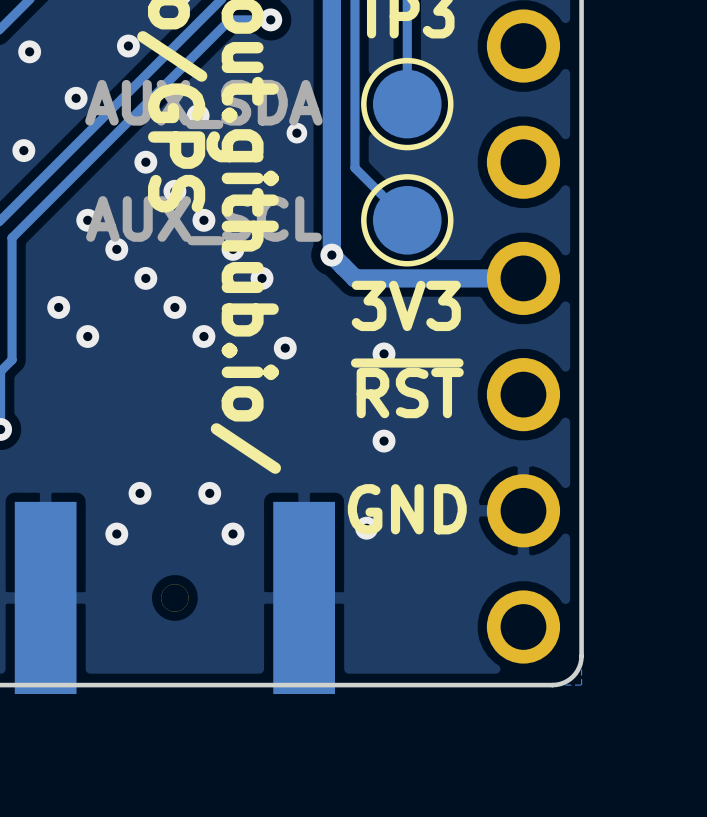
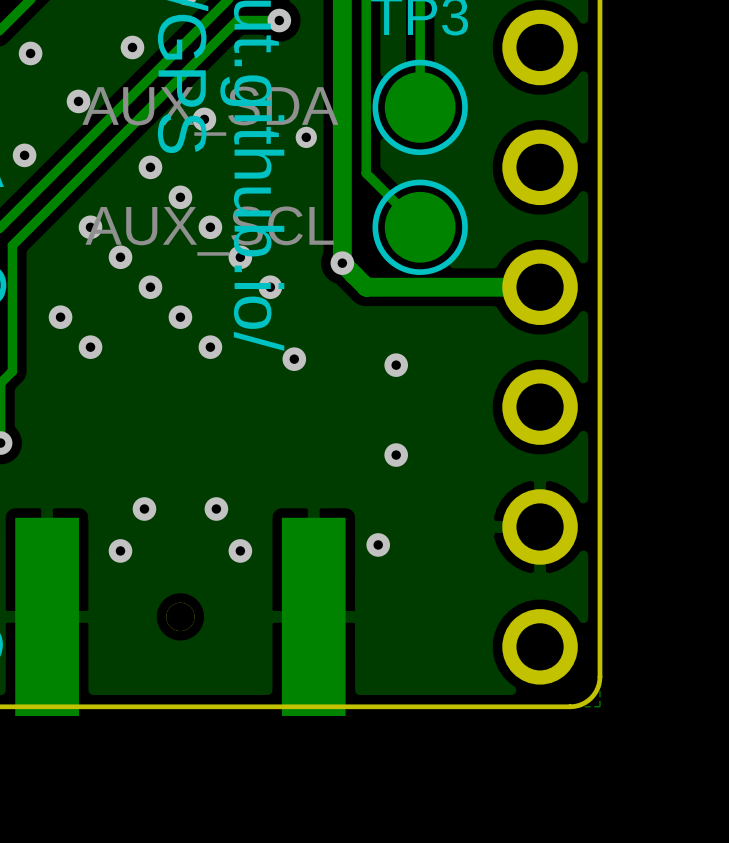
text: 3V3 (406, 305) -> none
text: ~{RST} (407, 388) -> none
text: GND (407, 509) -> none

